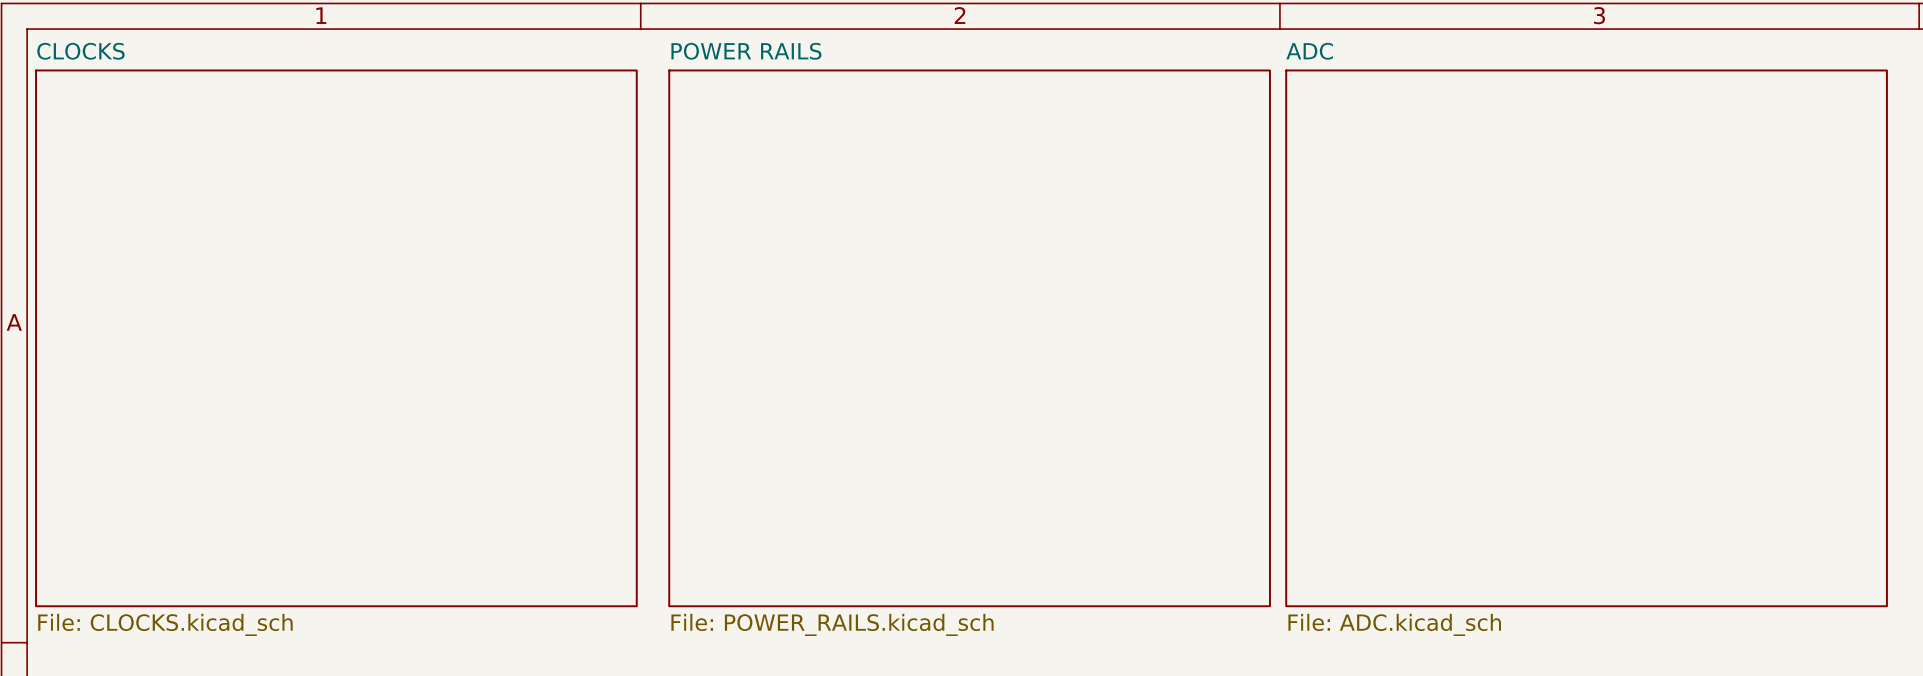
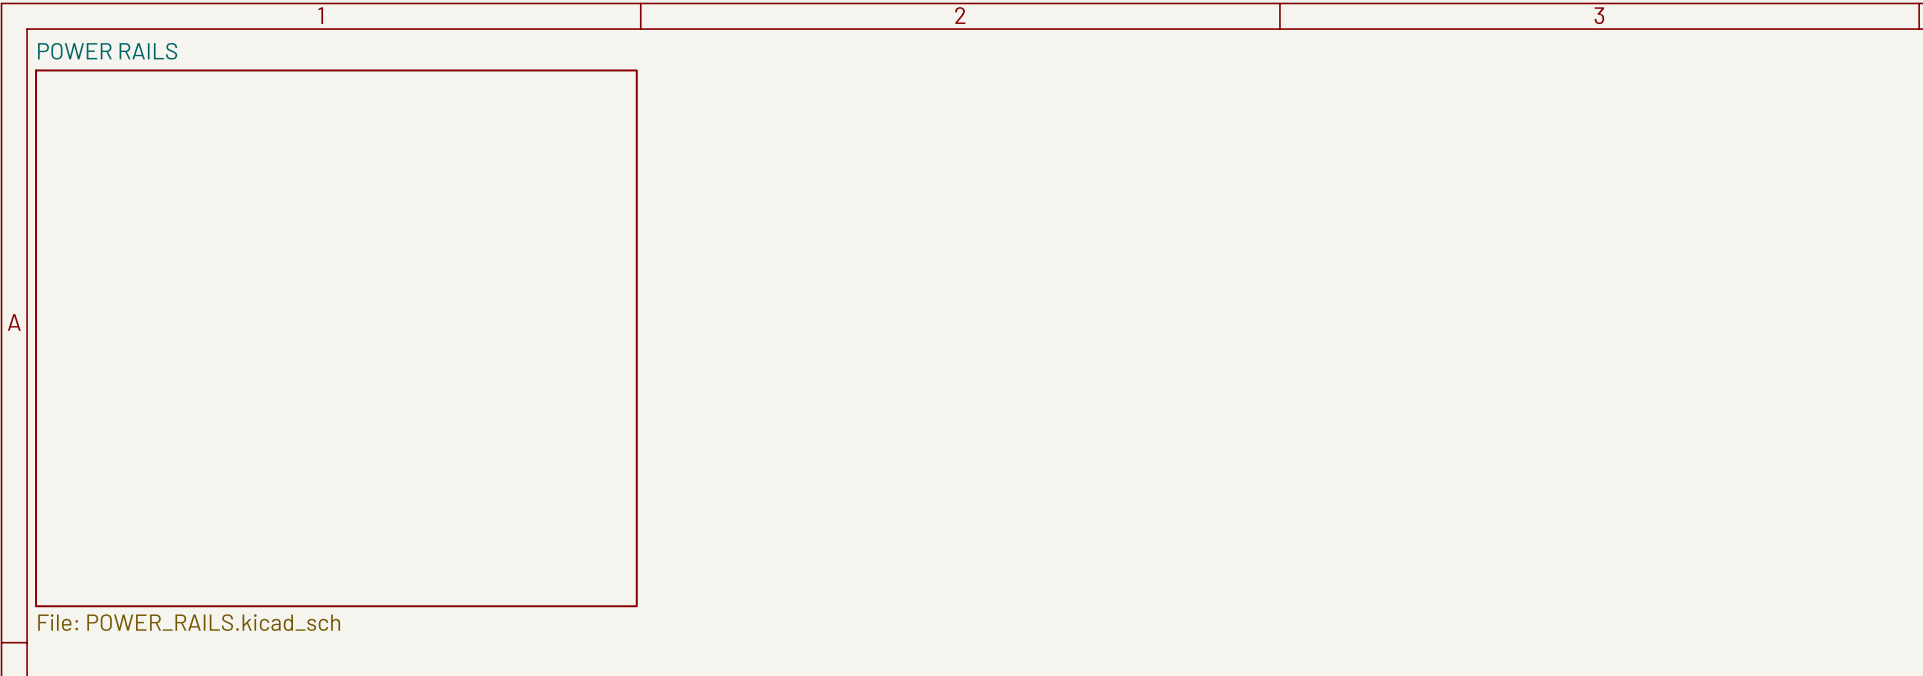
sheet CLOCKS name: CLOCKS (80, 51) -> POWER RAILS (107, 51)
sheet POWER RAILS: File: POWER_RAILS.kicad_sch (969, 338) -> none
sheet ADC: File: ADC.kicad_sch (1586, 338) -> none
sheet CLOCKS value: File: CLOCKS.kicad_sch (165, 624) -> File: POWER_RAILS.kicad_sch (189, 622)

